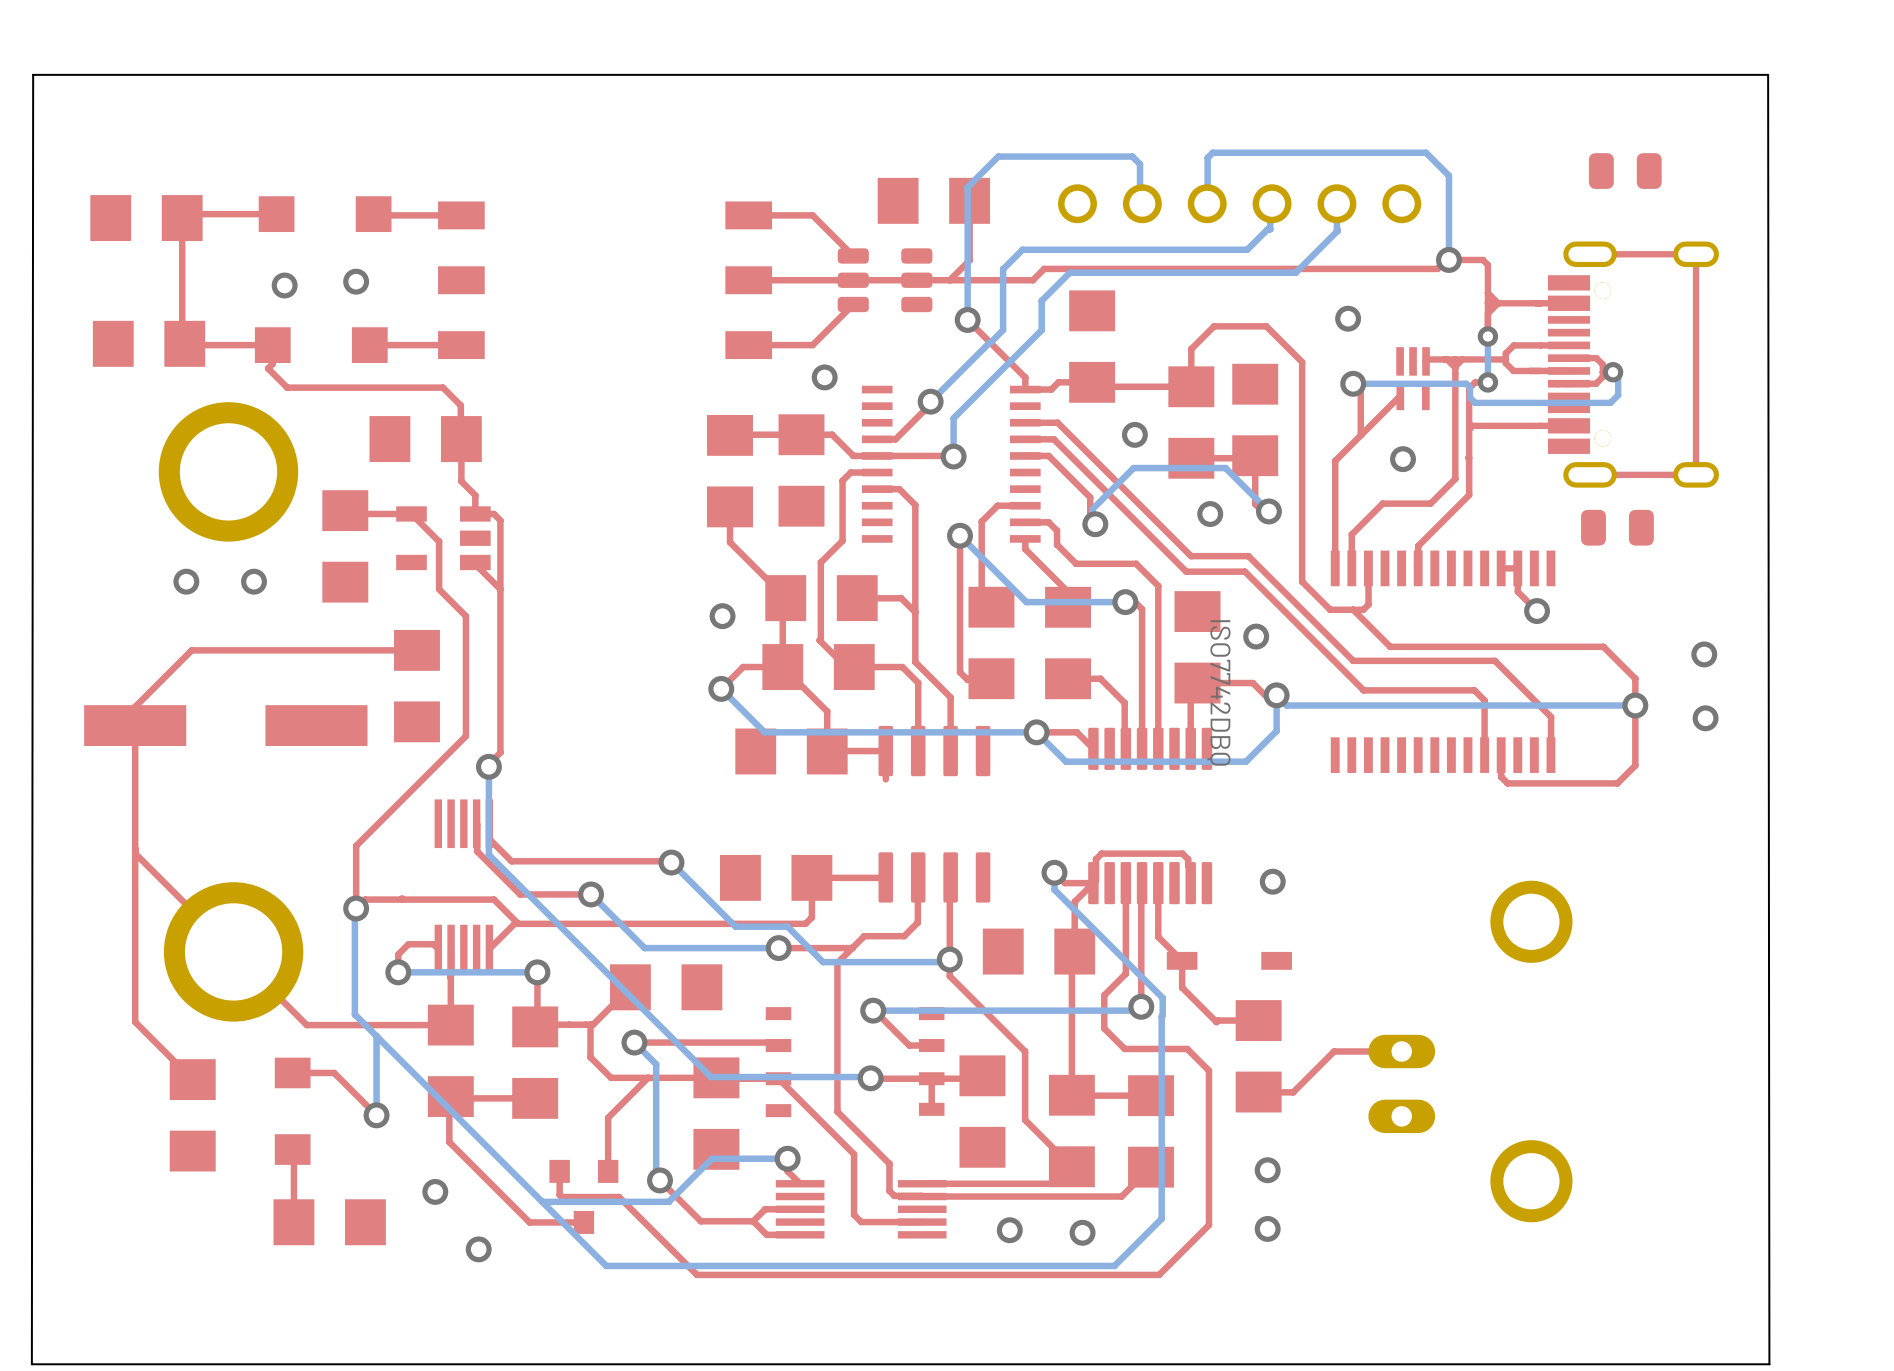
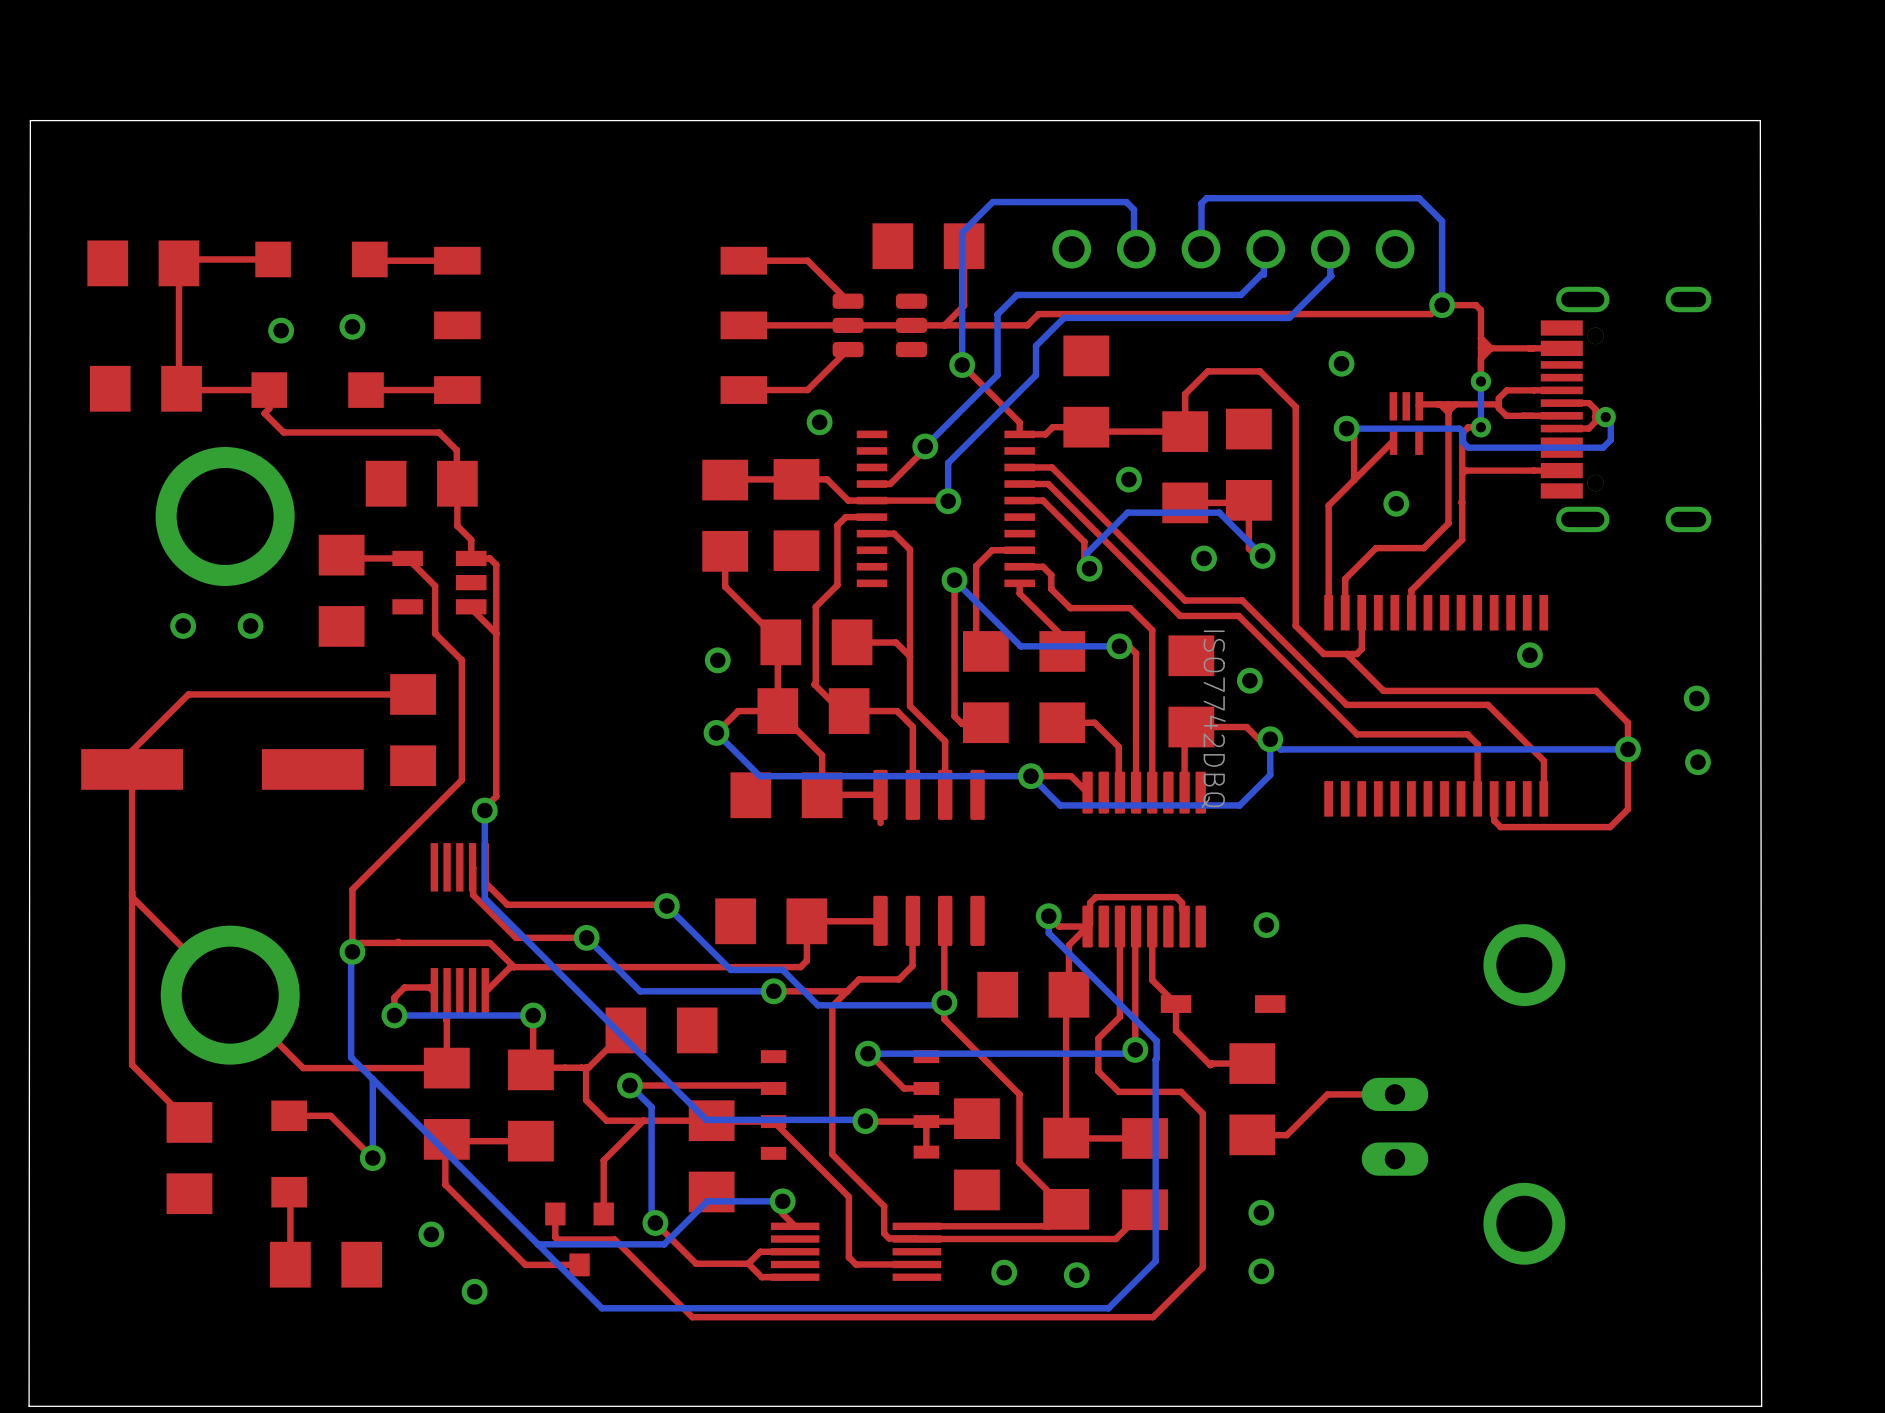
part: (1625, 171) -> none
top track: (1590, 254) (1696, 254) (1696, 474) (1590, 474) -> none
part: (1617, 527) -> none
top track: (1501, 568) (1517, 568) (1517, 591) (1537, 611) -> none

